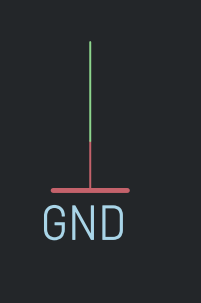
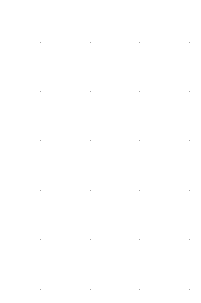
wire: (90, 42) (90, 140) -> none
power symbol: GND (90, 166) -> none

